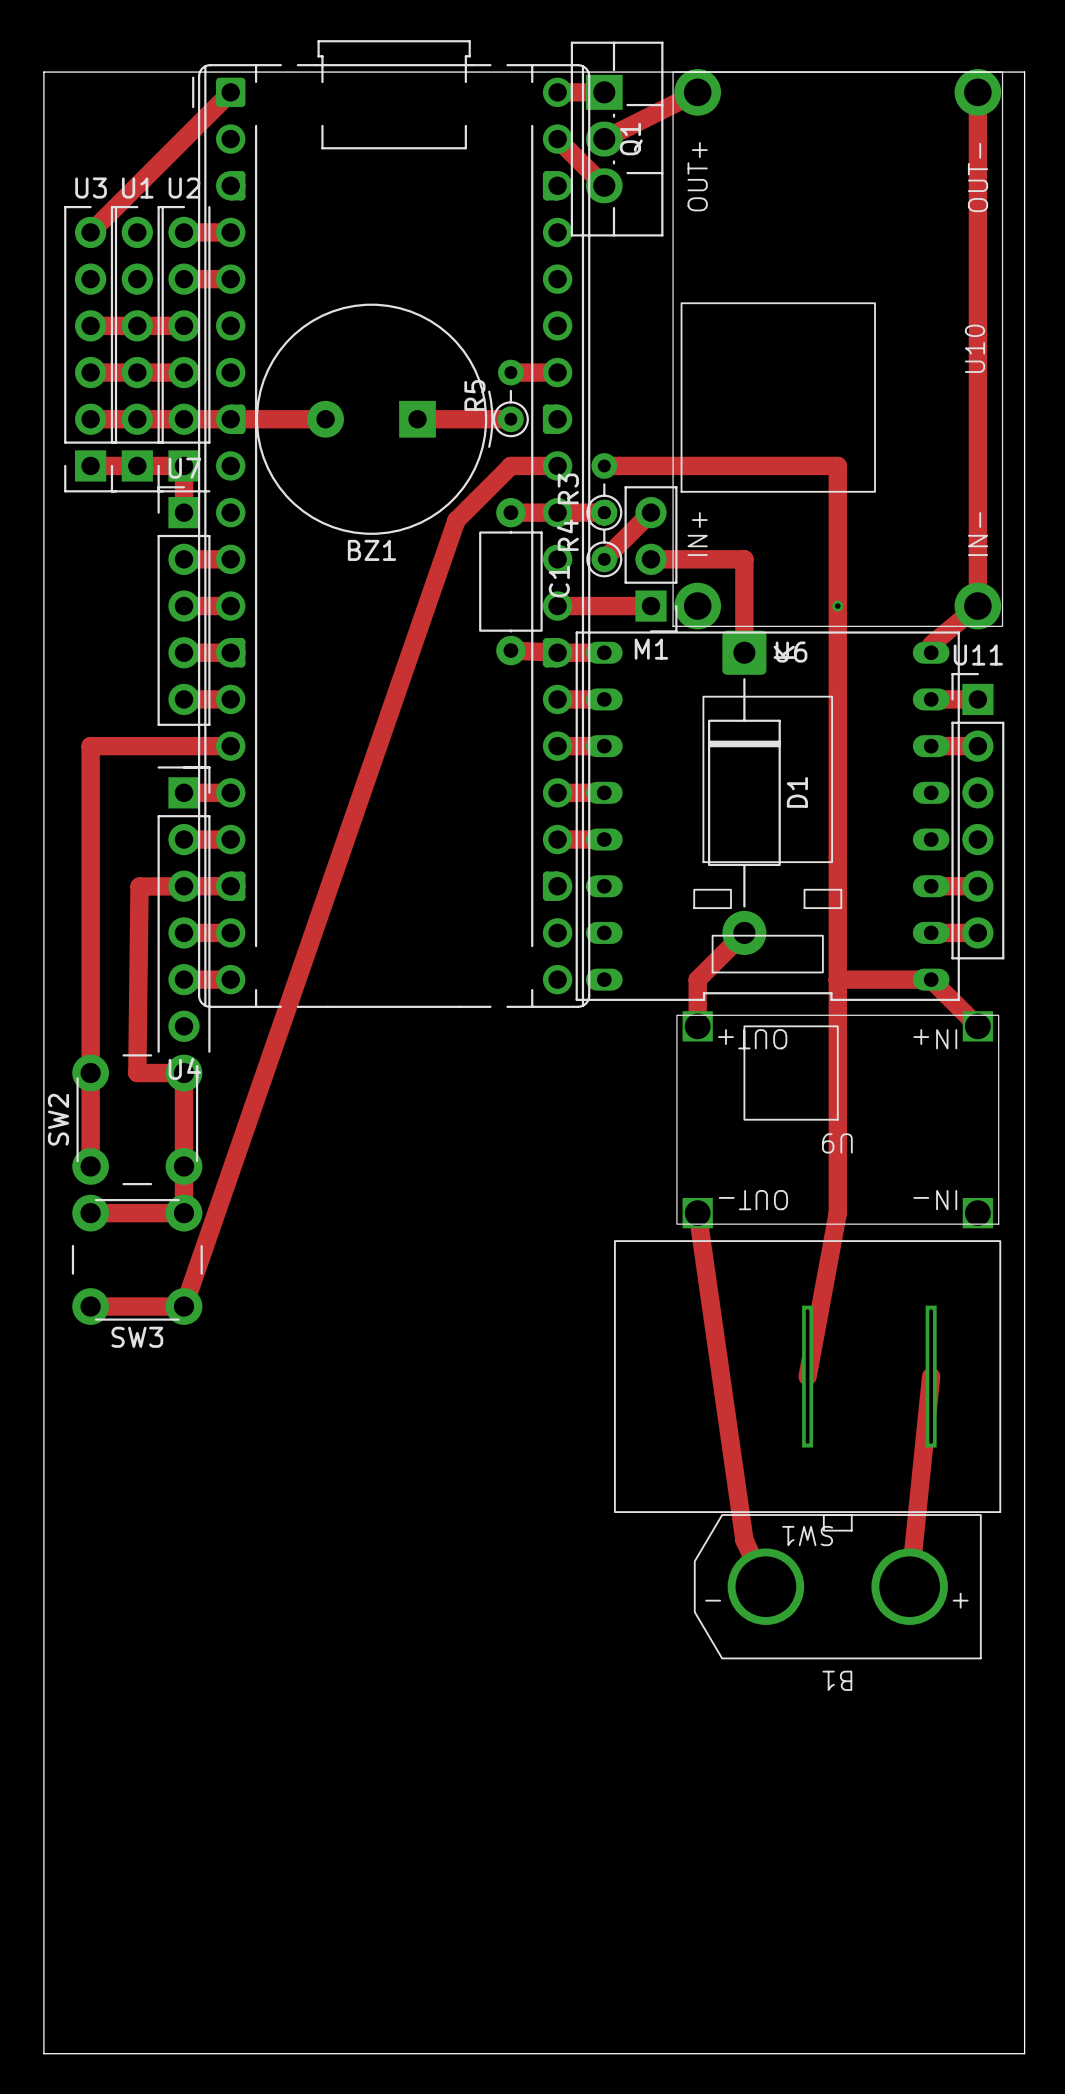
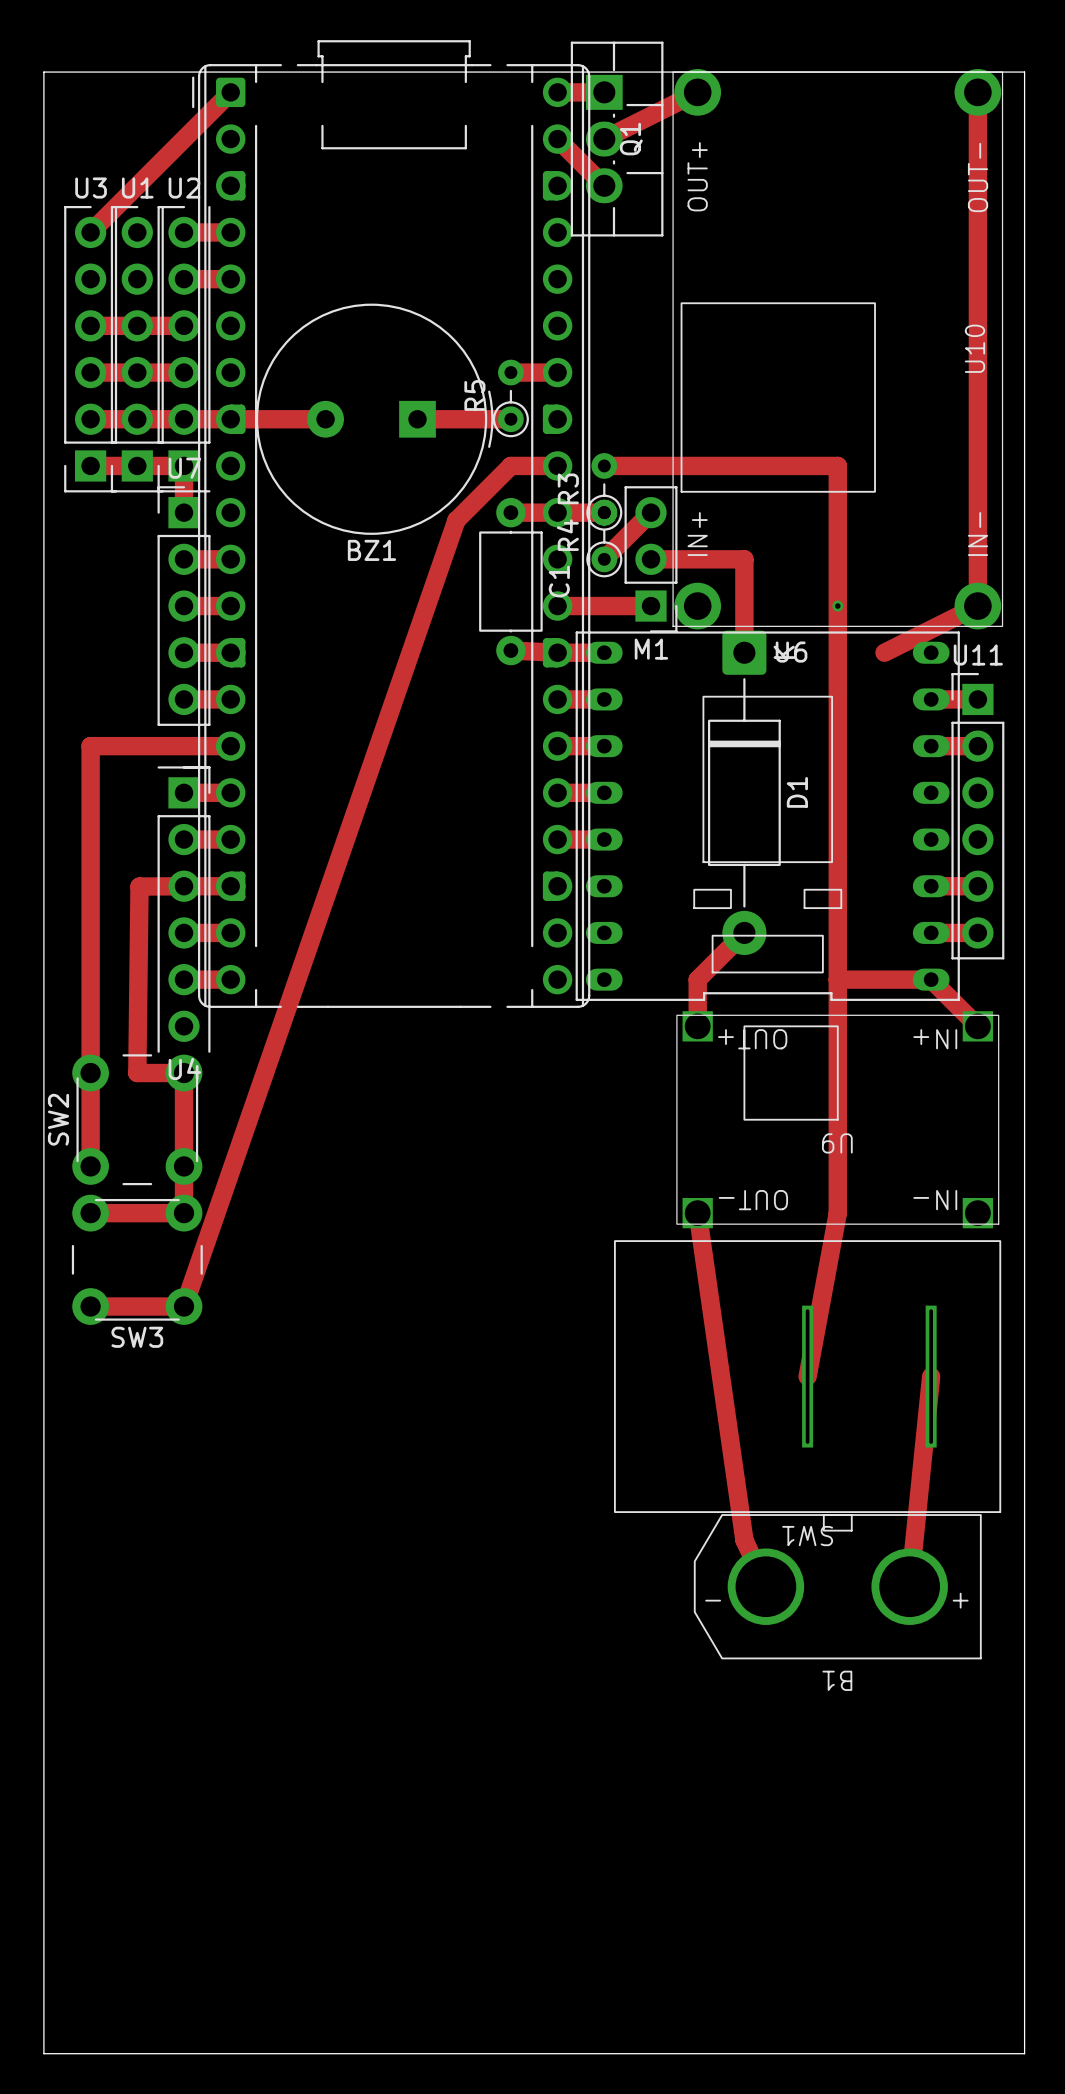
track: (977, 606) (931, 644) -> (977, 606) (884, 652)

